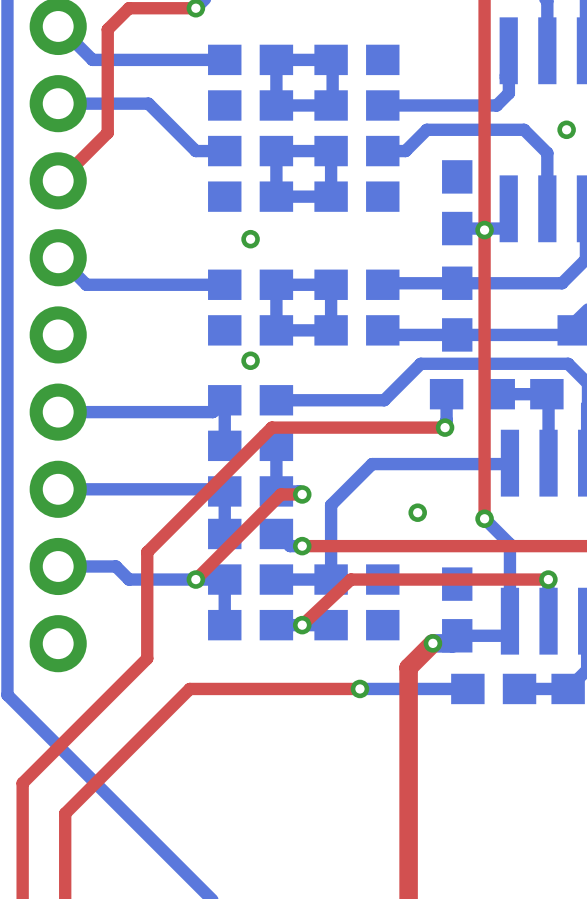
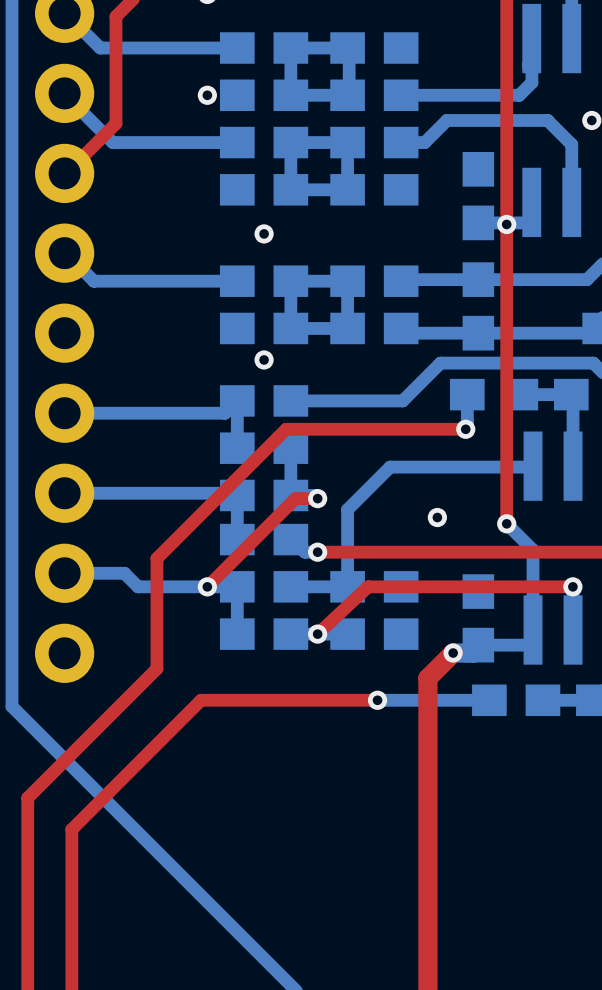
bottom track: (58, 103) (148, 103) (195, 151) -> (64, 93) (112, 142) (207, 142)
via: none -> (207, 95)

